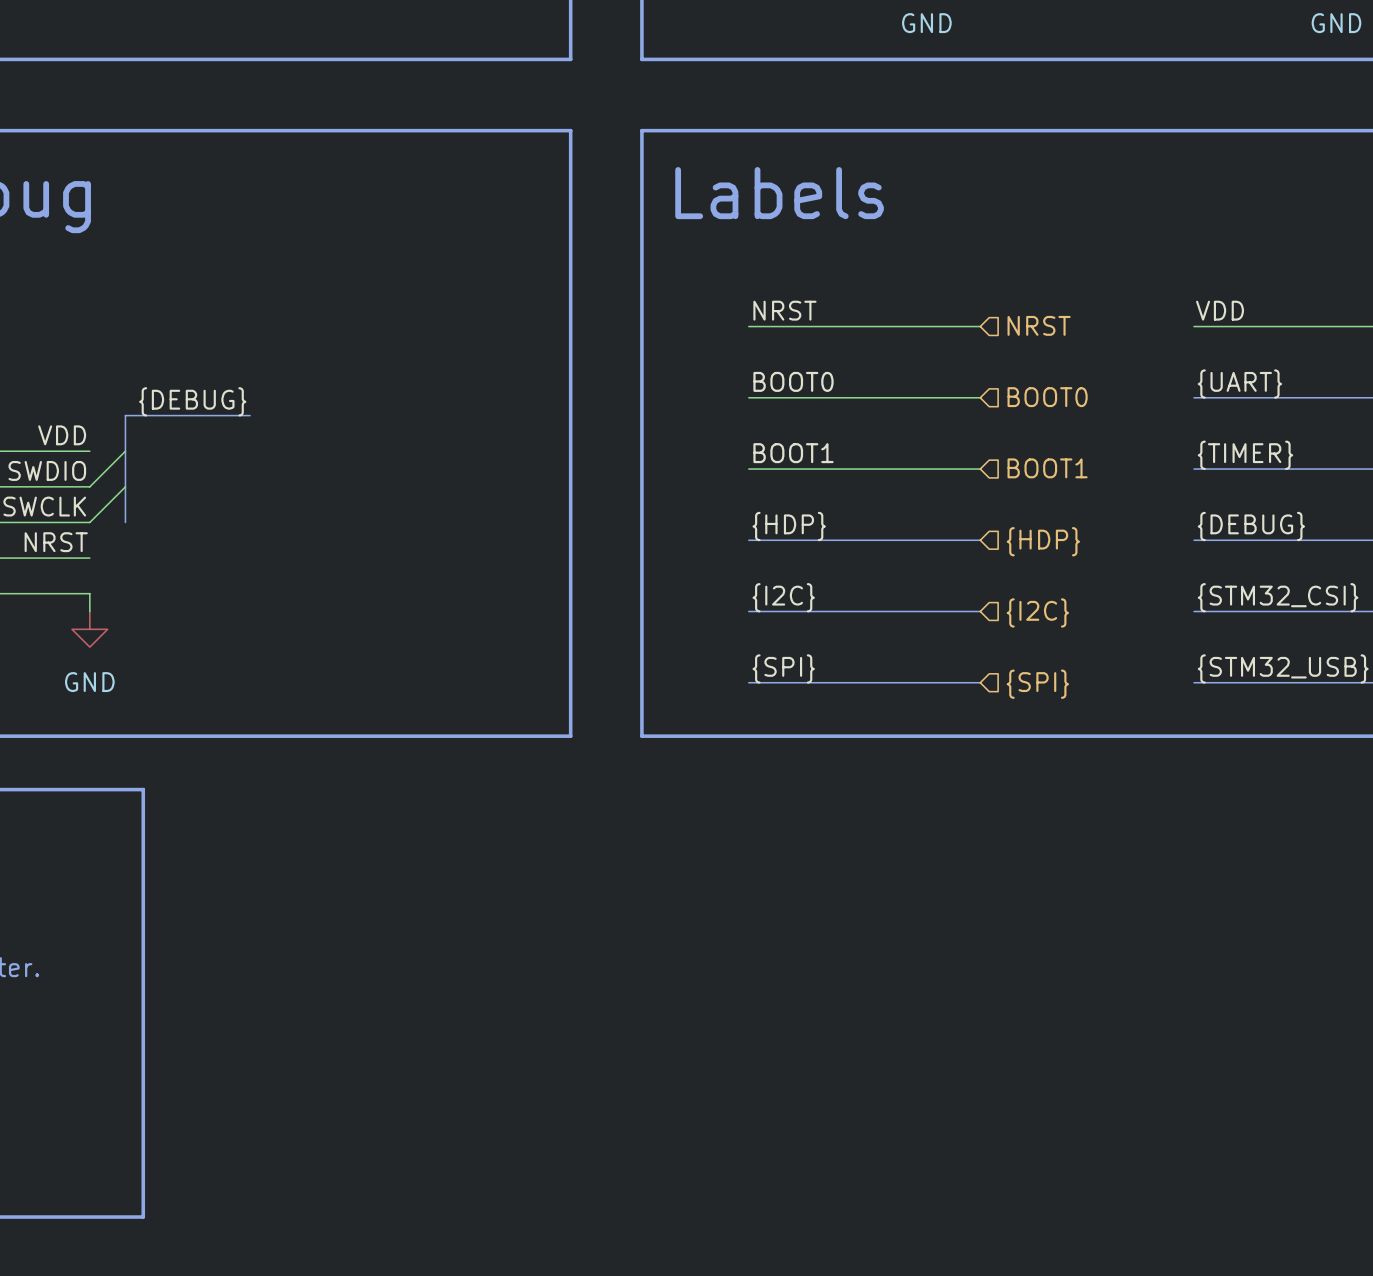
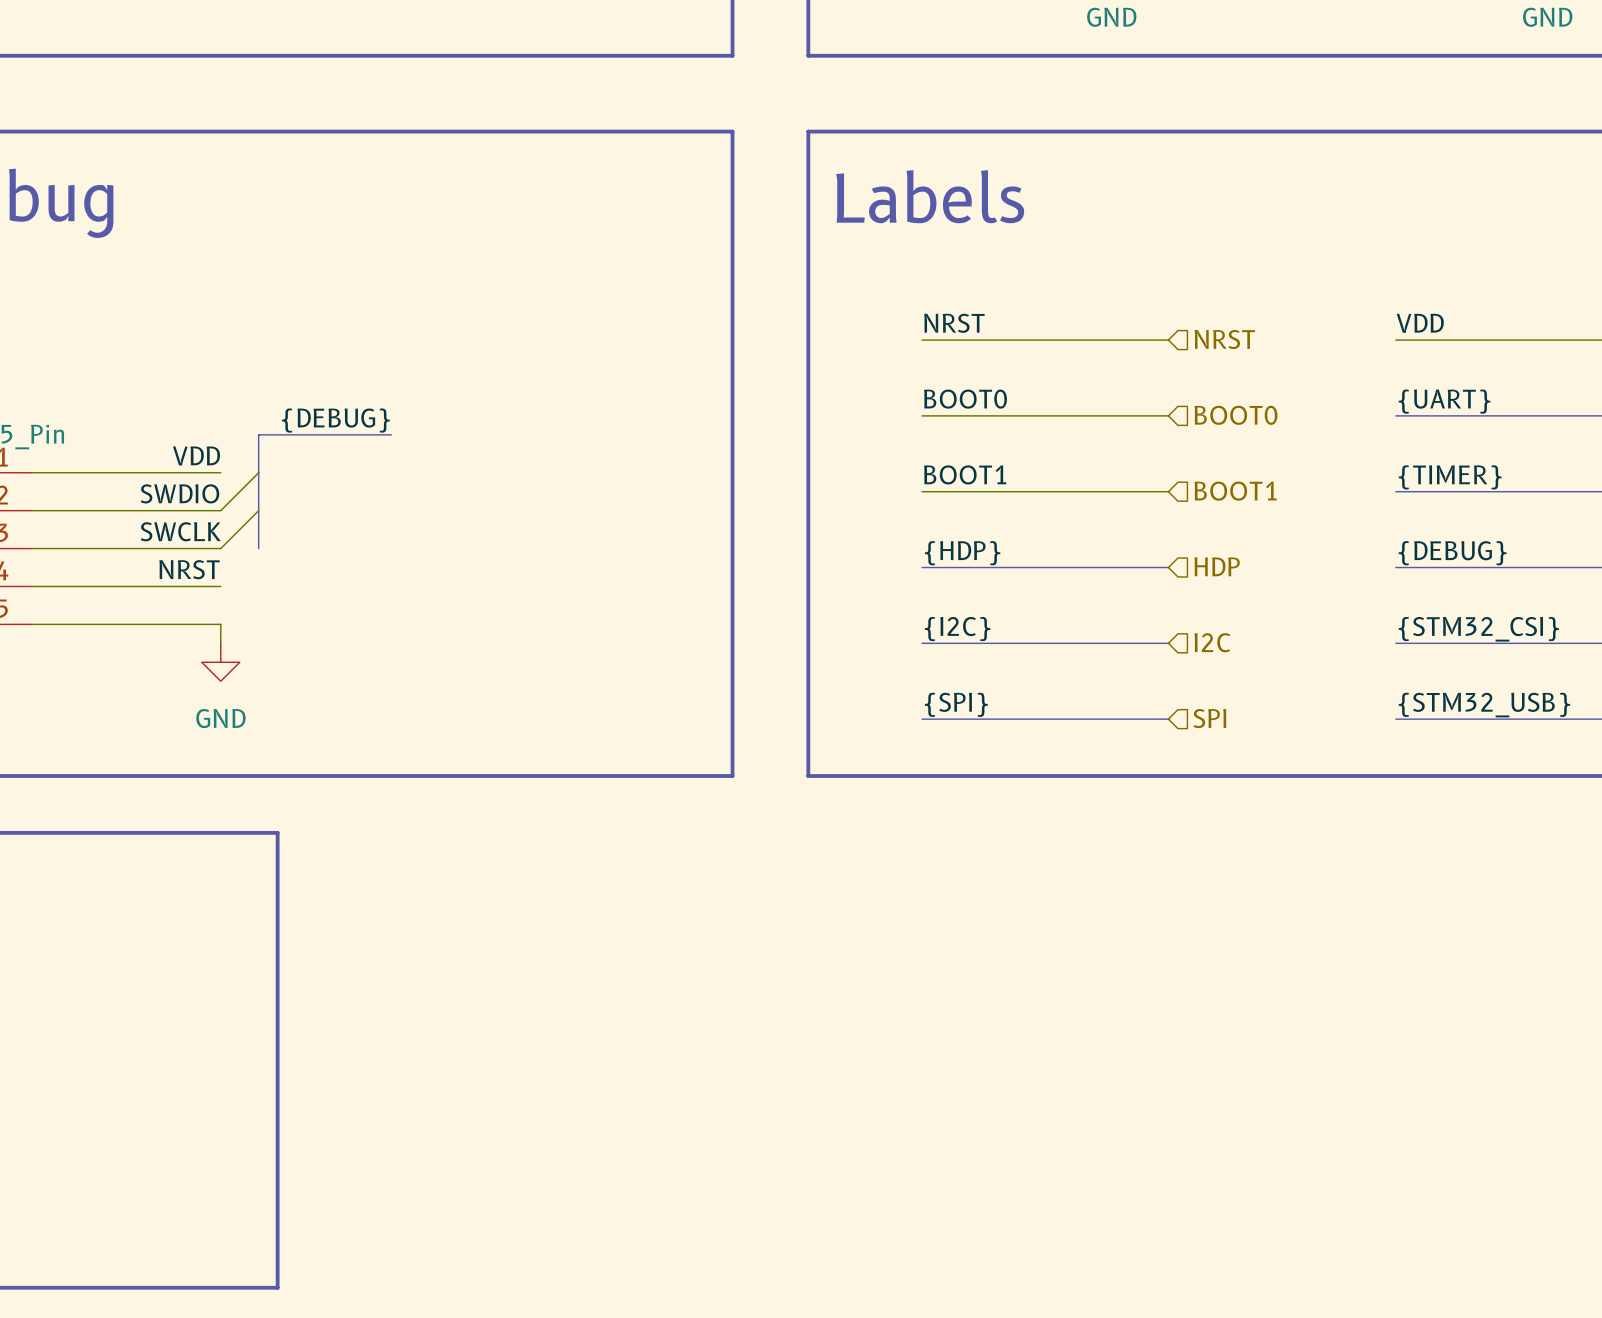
hierarchical label: {HDP} (1043, 541) -> HDP (1217, 566)
hierarchical label: {I2C} (1037, 612) -> I2C (1212, 642)
hierarchical label: {SPI} (1037, 684) -> SPI (1209, 718)

